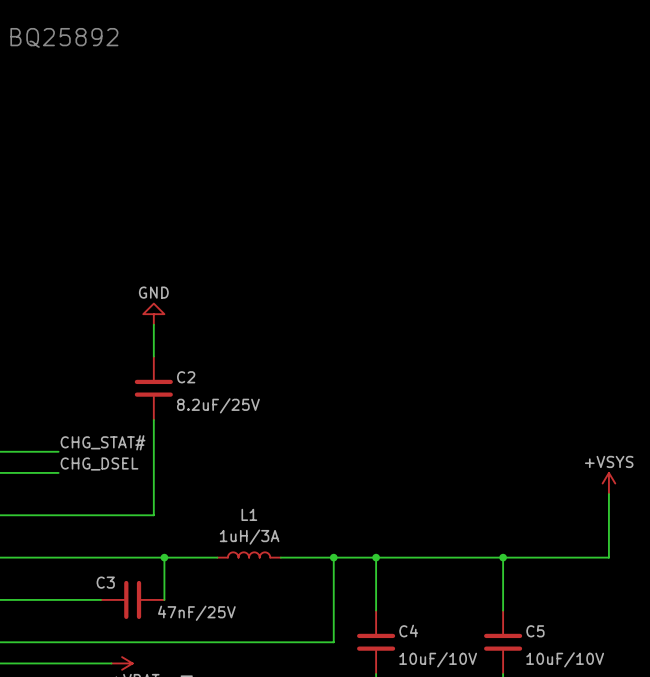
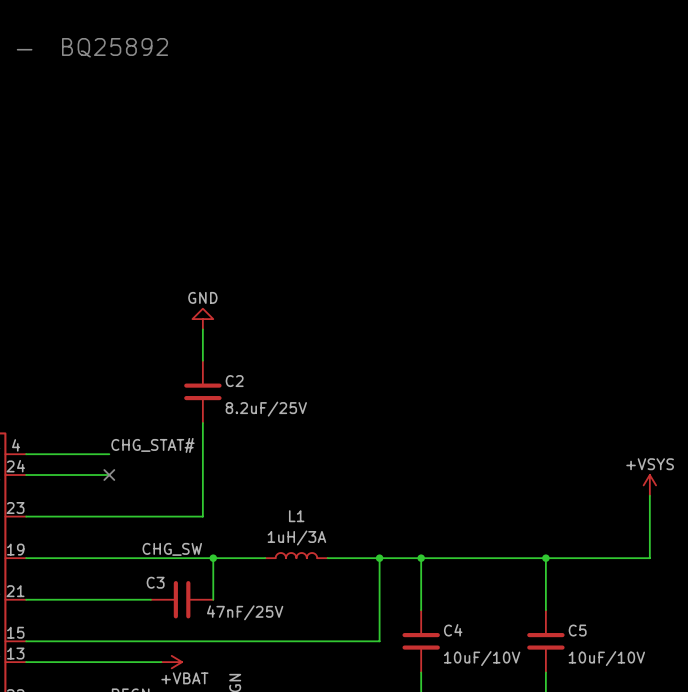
label: CHG_DSEL (99, 464) -> none
no-connect mark: none -> (109, 475)
label: none -> CHG_SW (172, 549)

